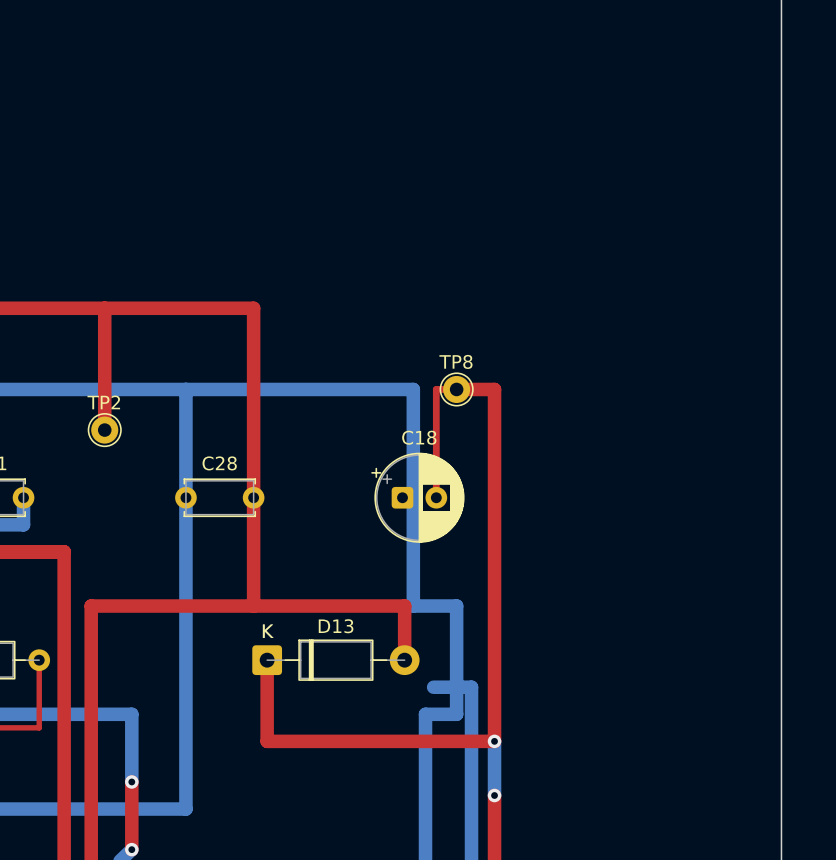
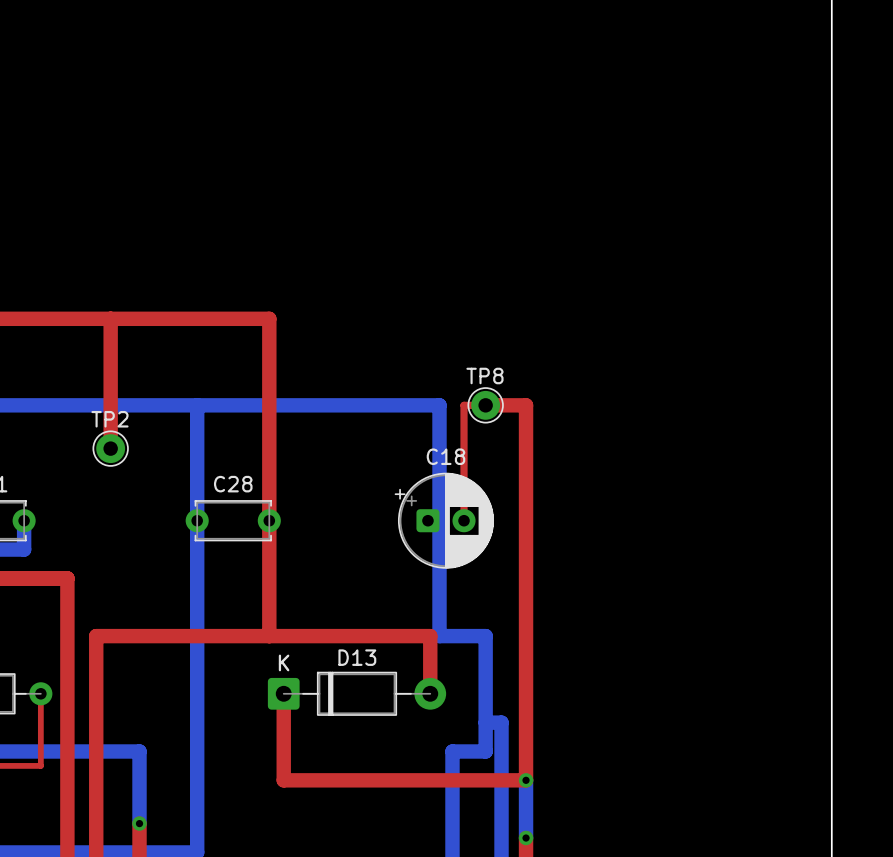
bottom track: (433, 687) (456, 687) -> none

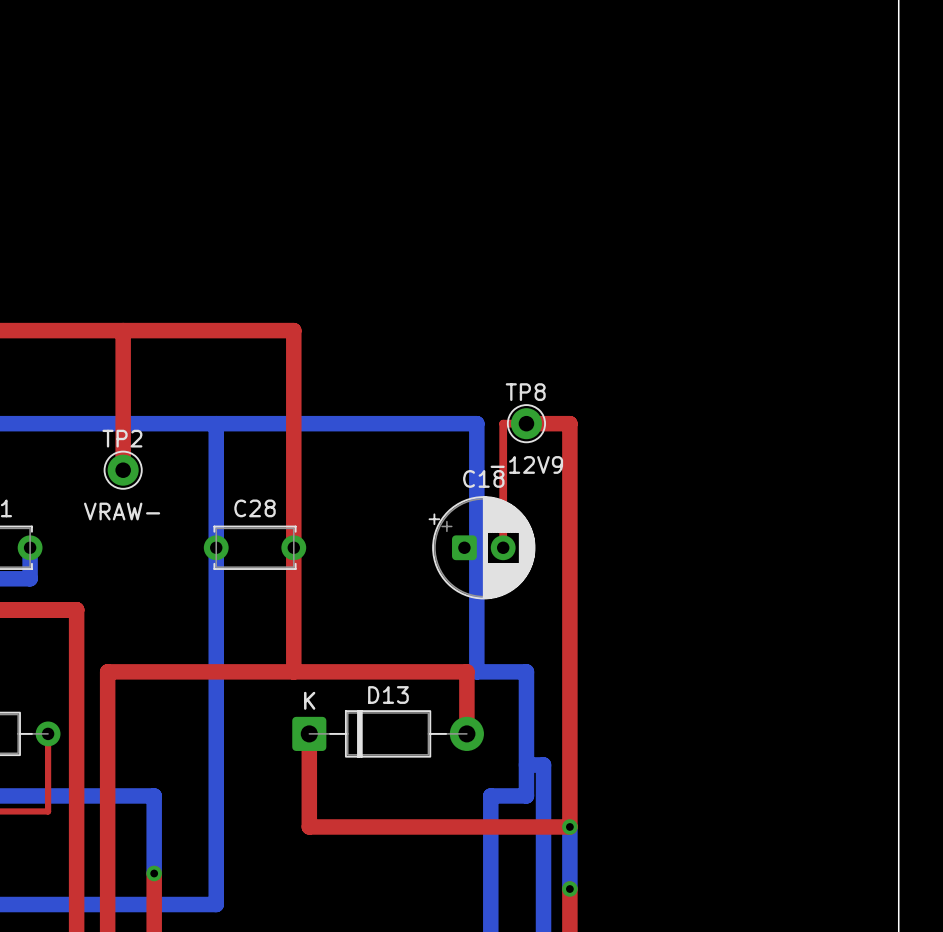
text: none -> -12V9 (526, 464)
text: none -> VRAW- (122, 511)

